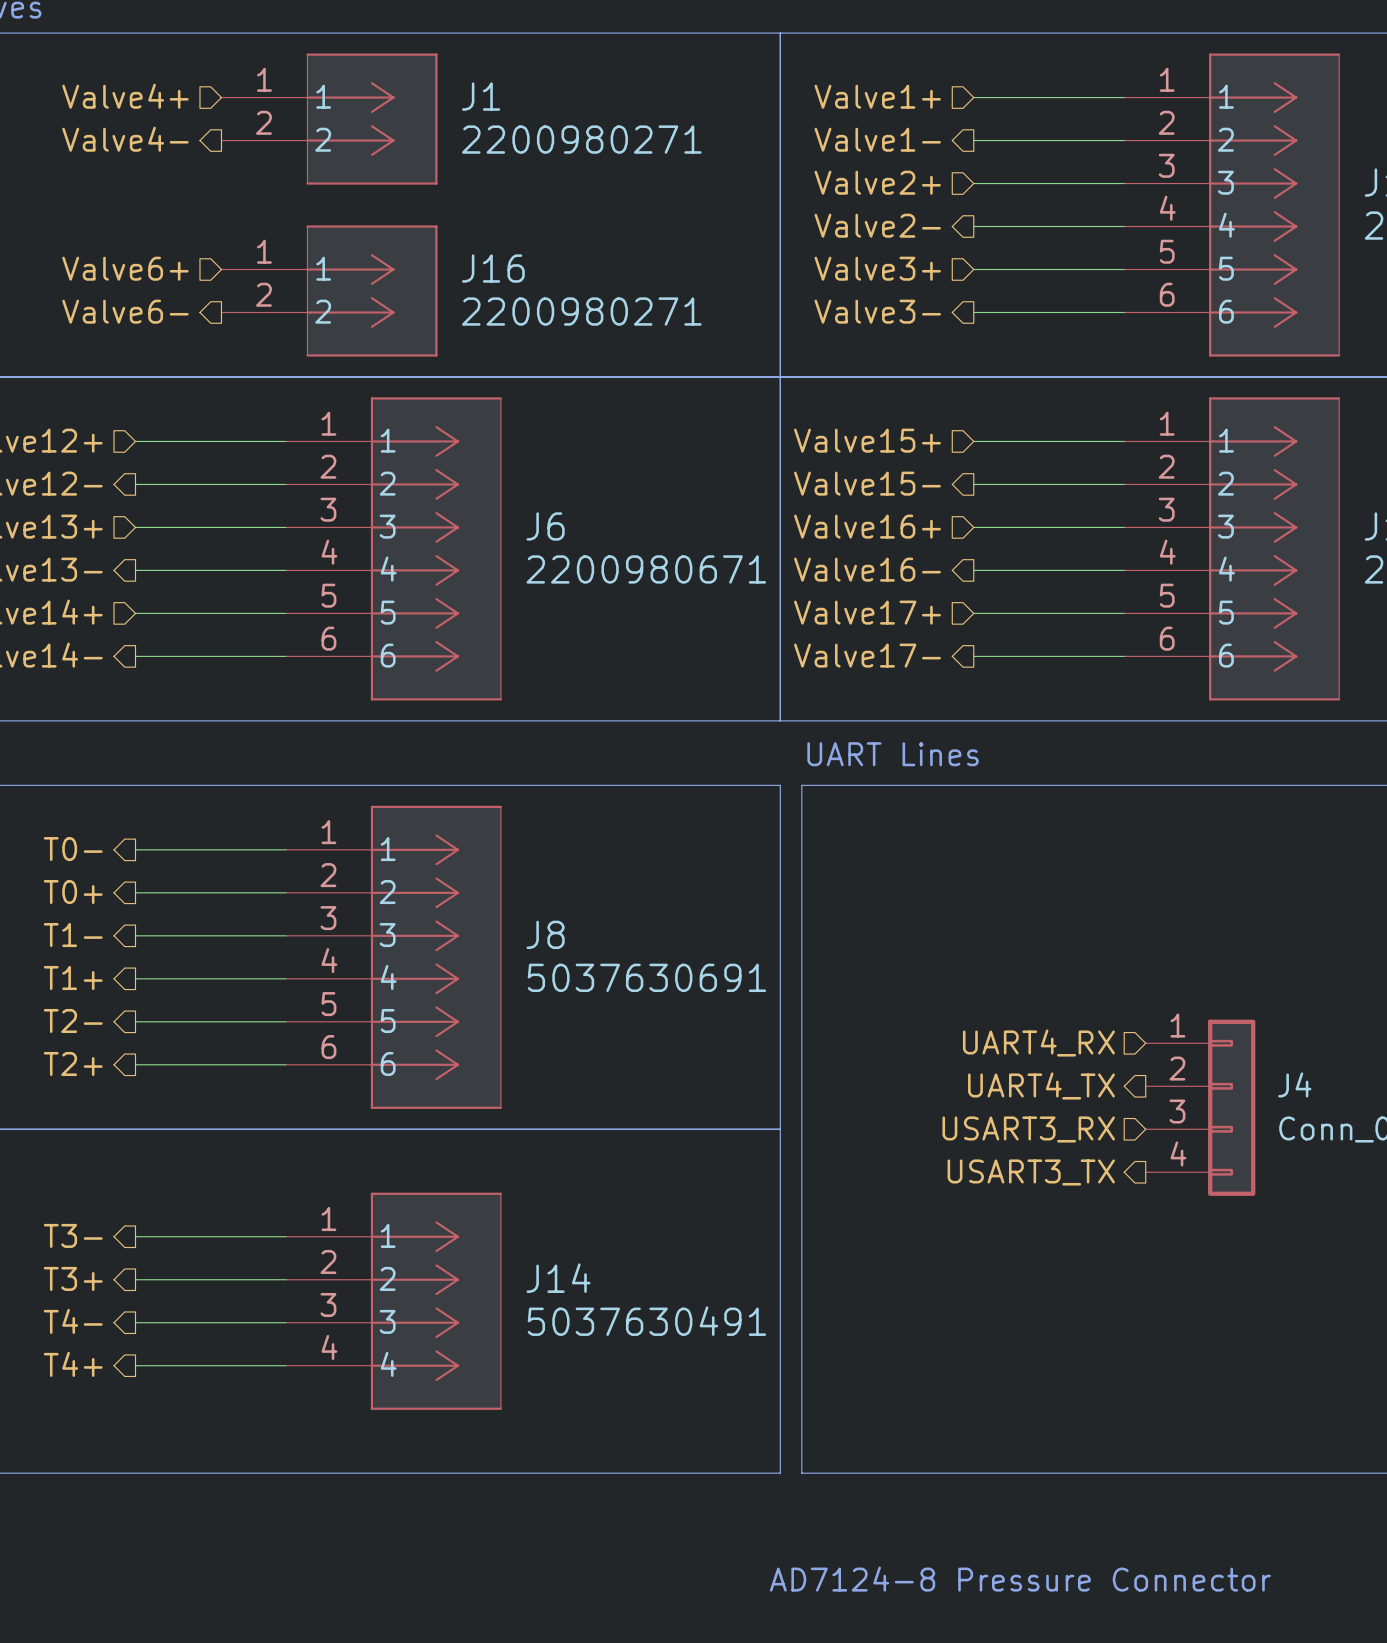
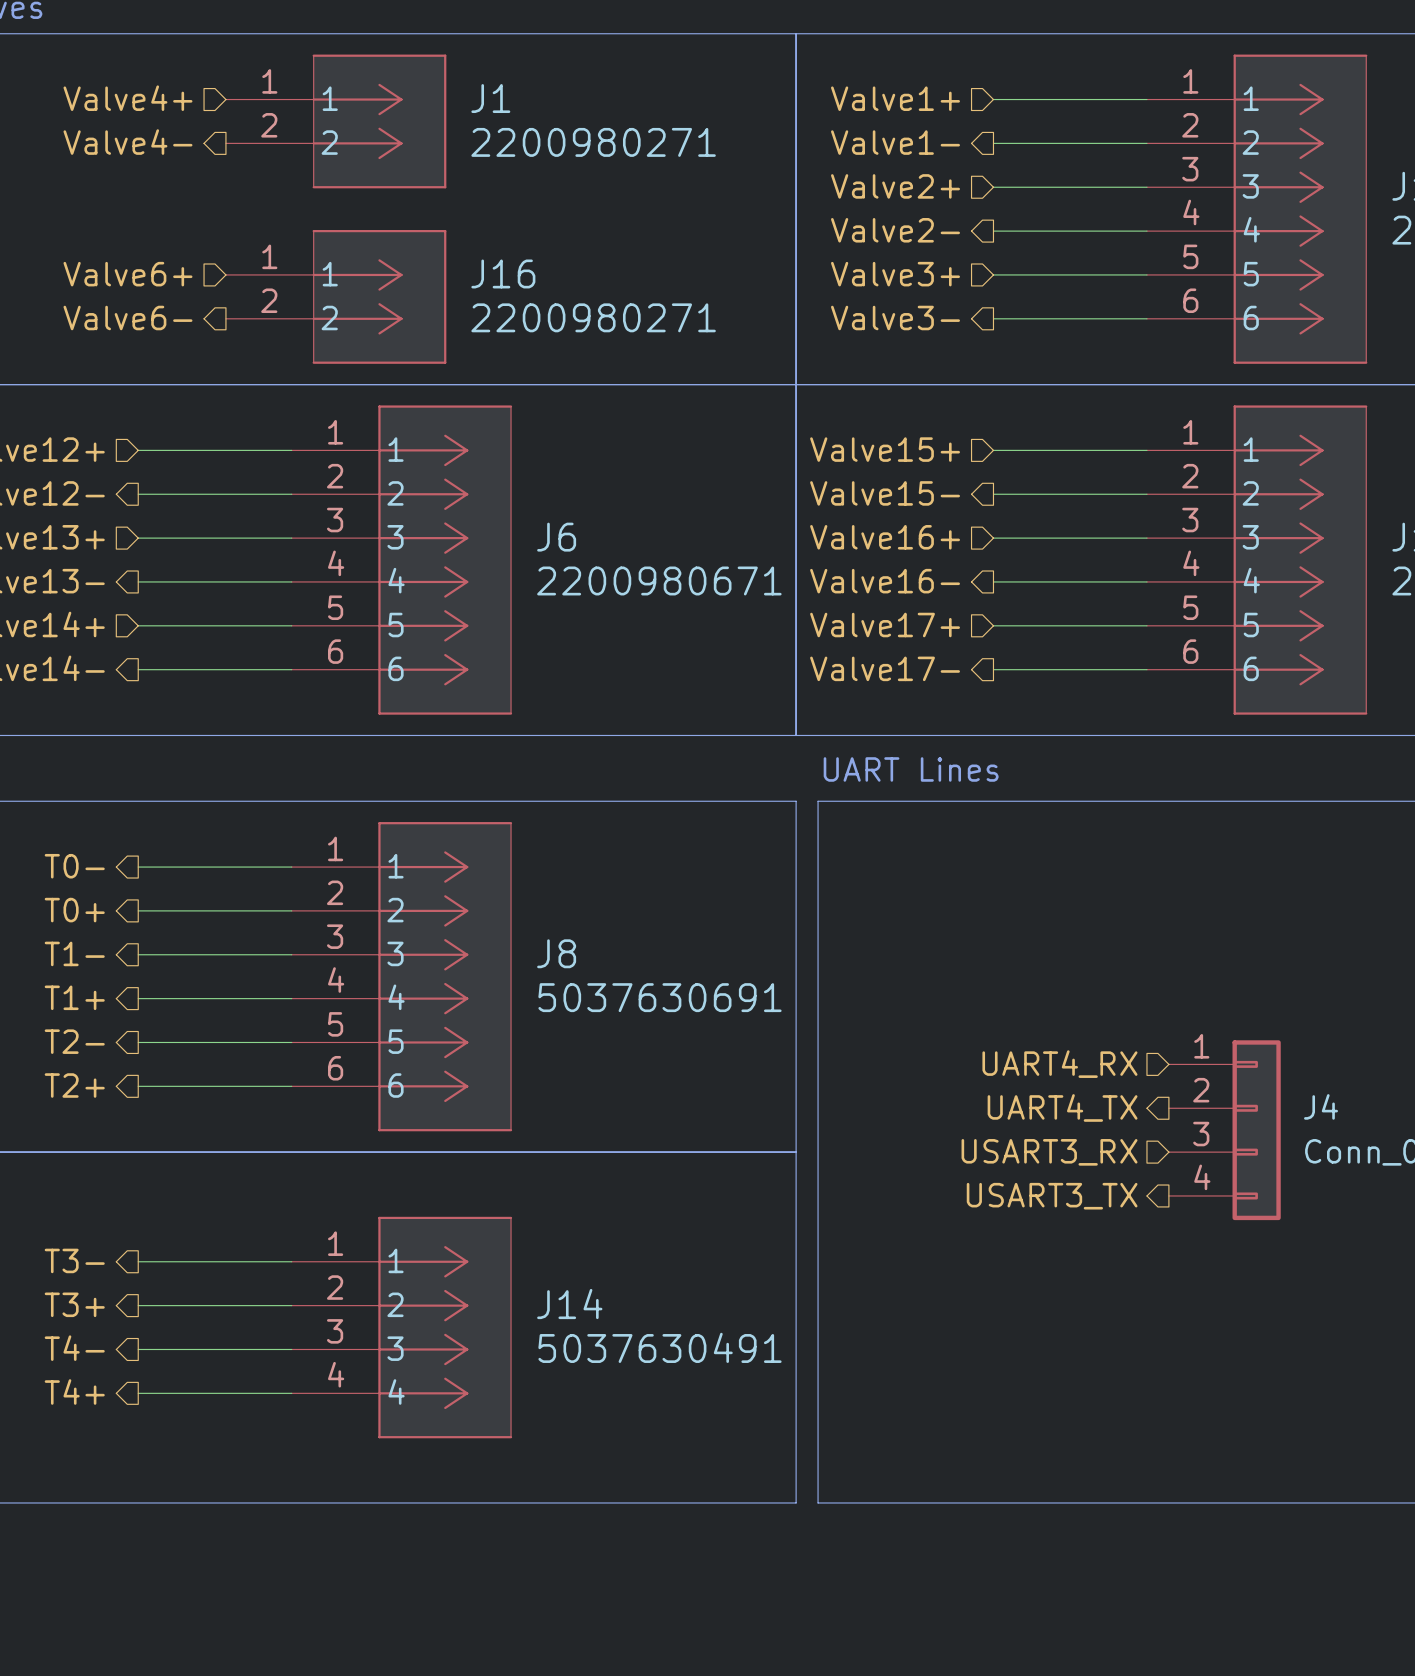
text: AD7124-8 Pressure Connector (1020, 1579) -> none

